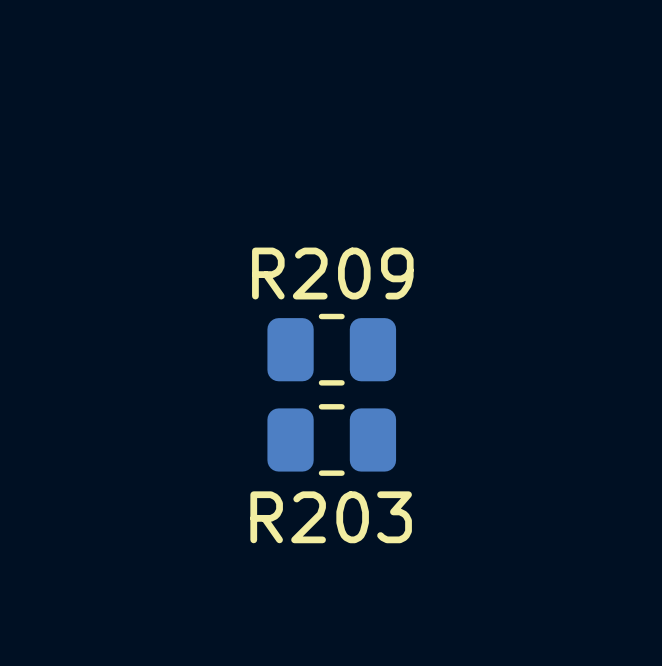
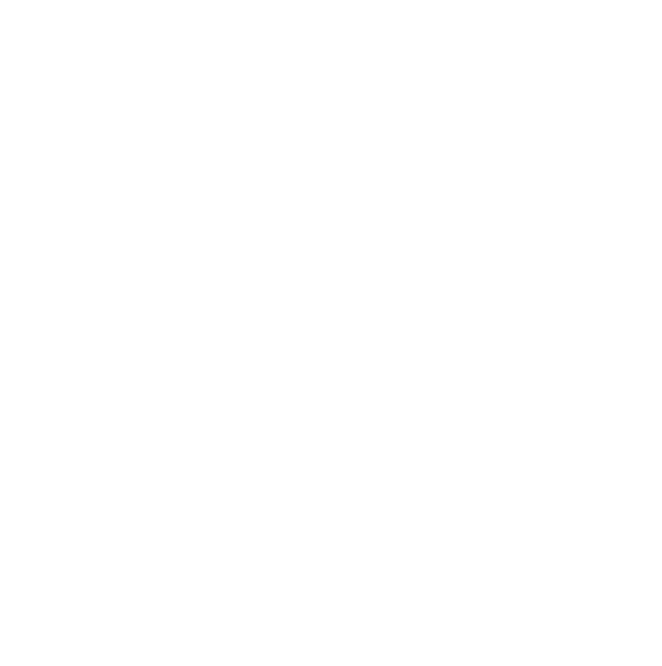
R209: (331, 349) -> none
R203: (331, 439) -> none

